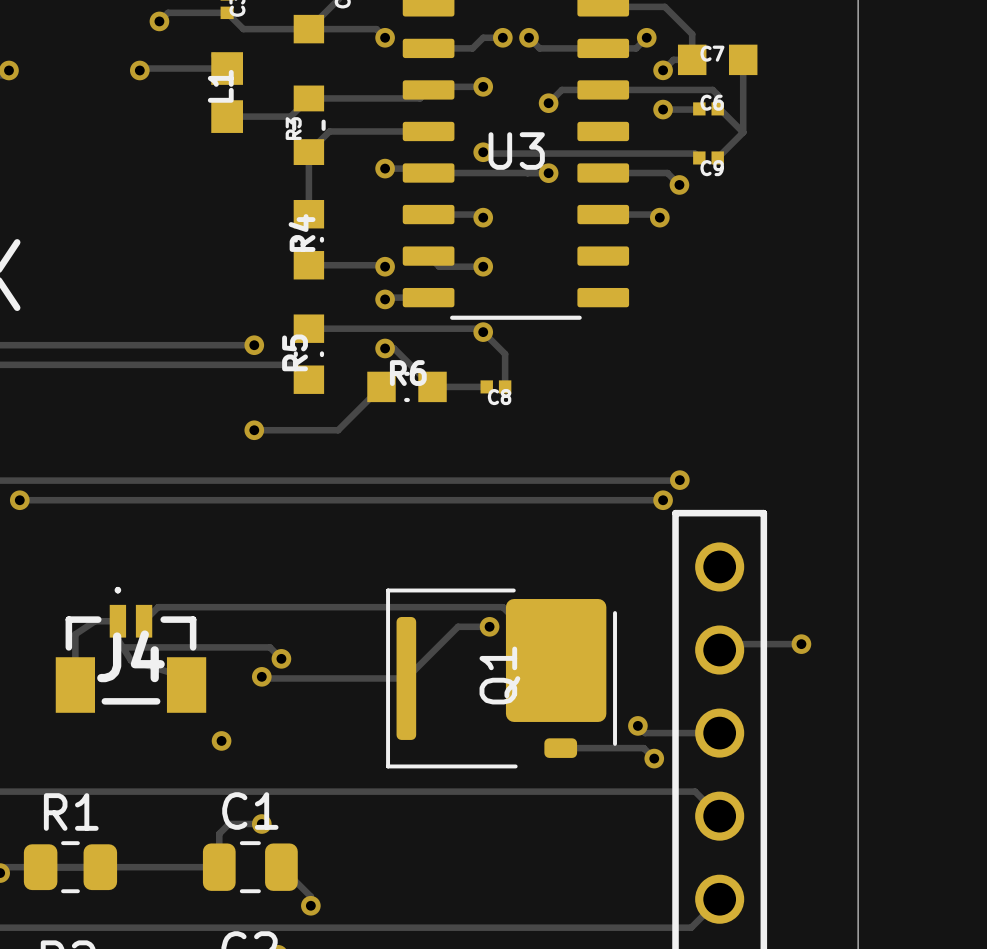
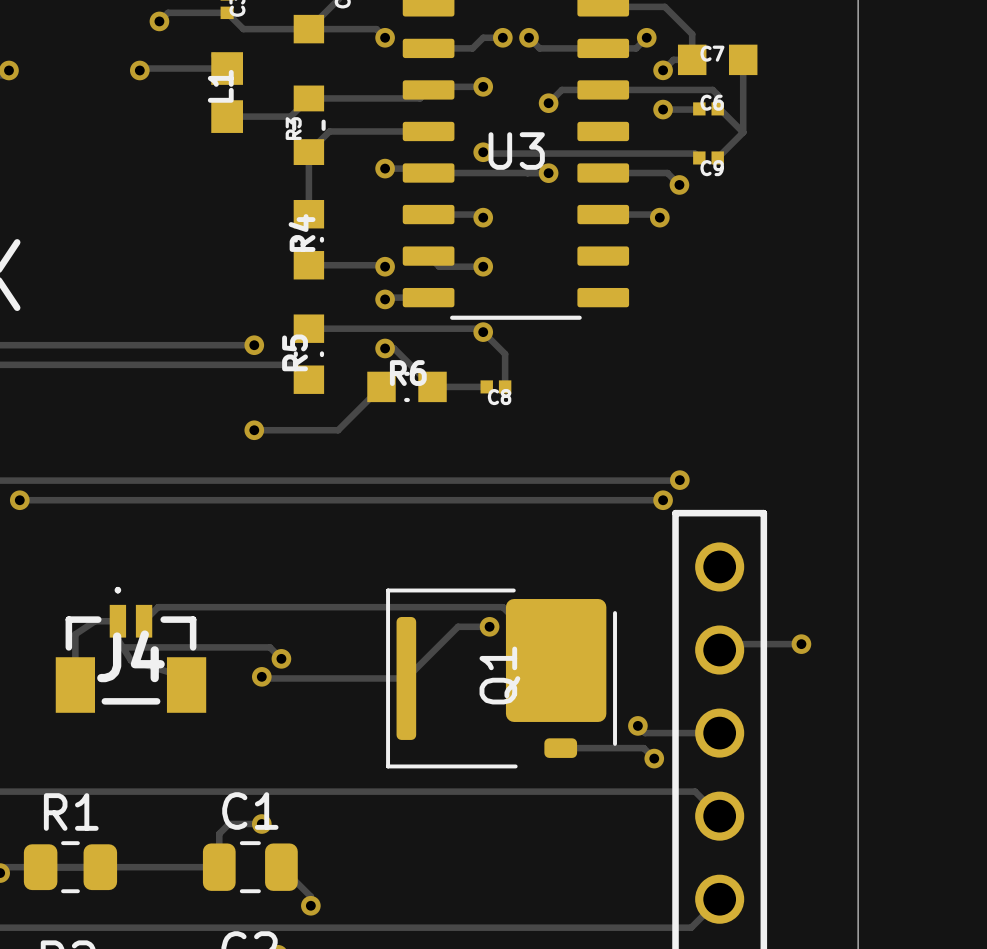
via: (221, 740) -> none

